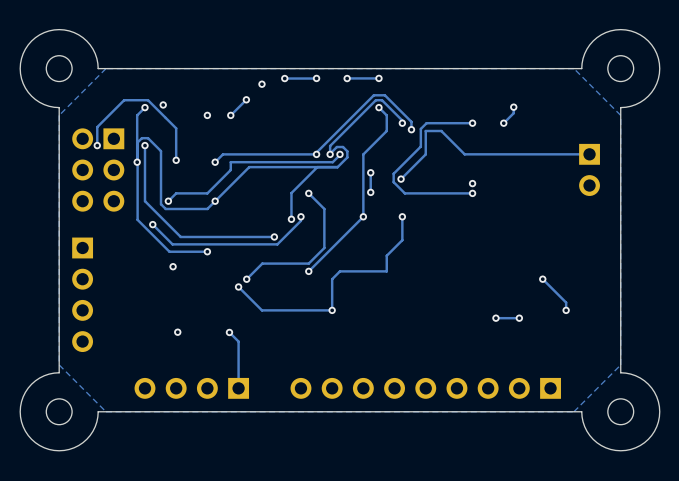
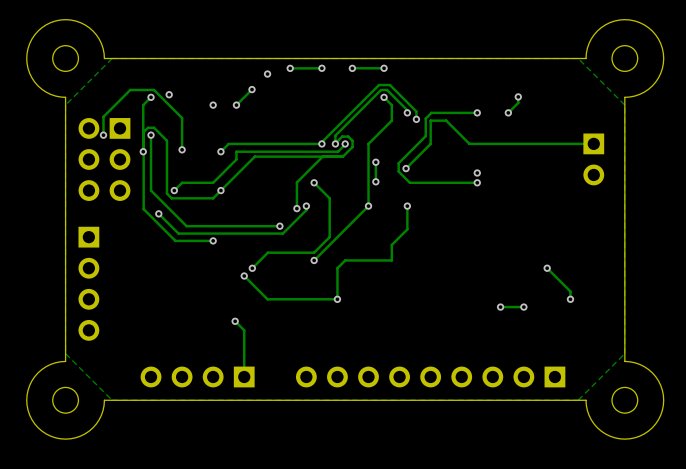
via: (173, 266) -> none
via: (177, 332) -> none

